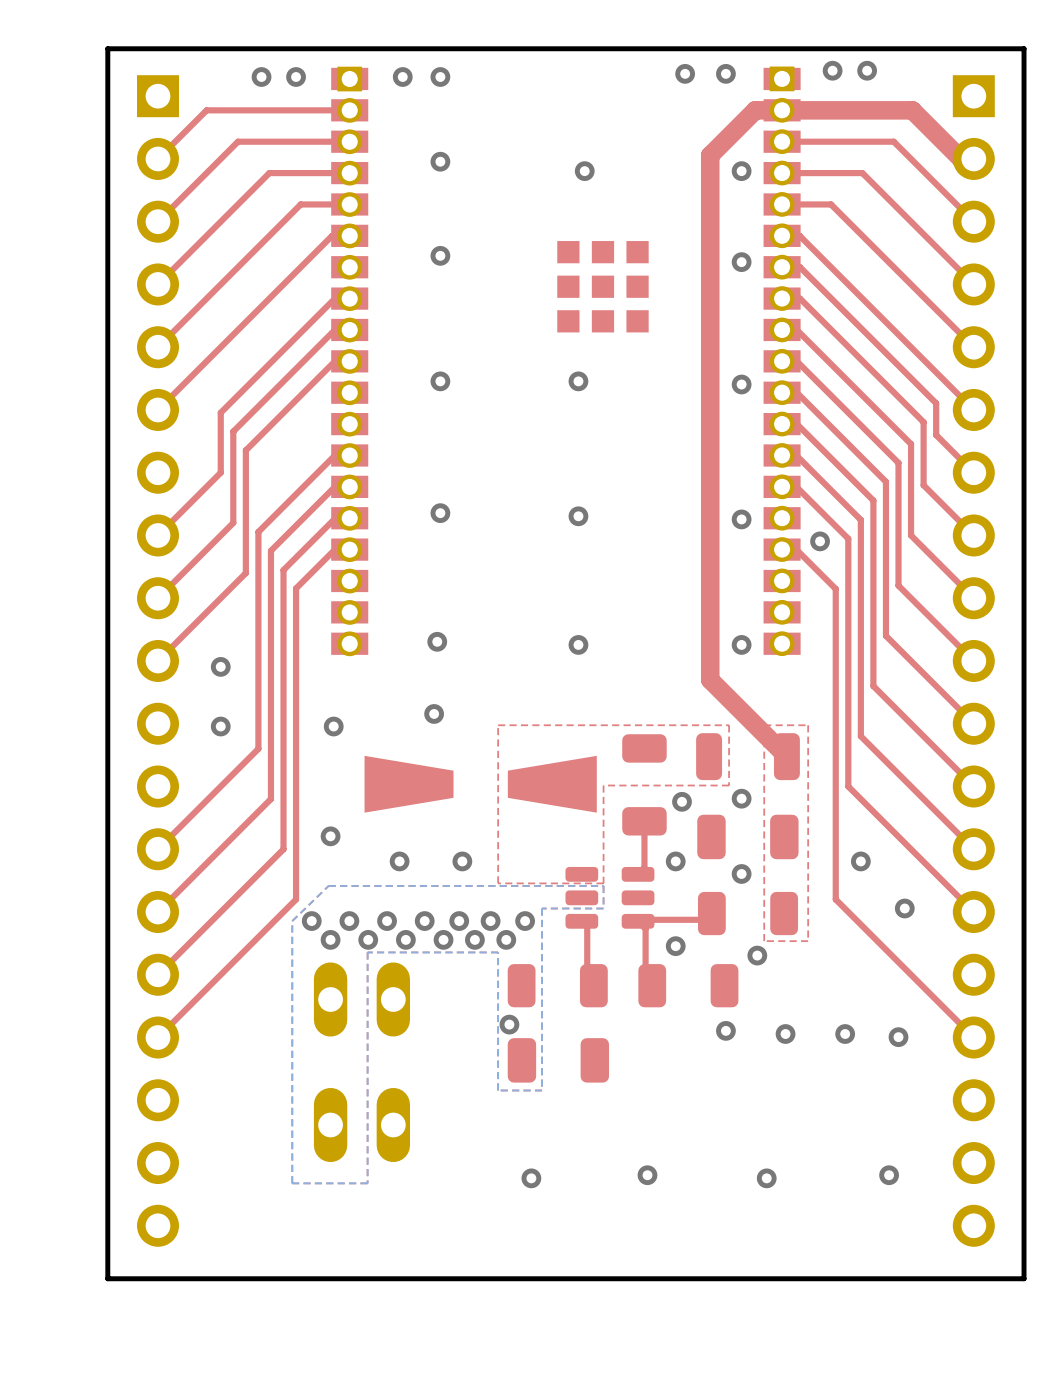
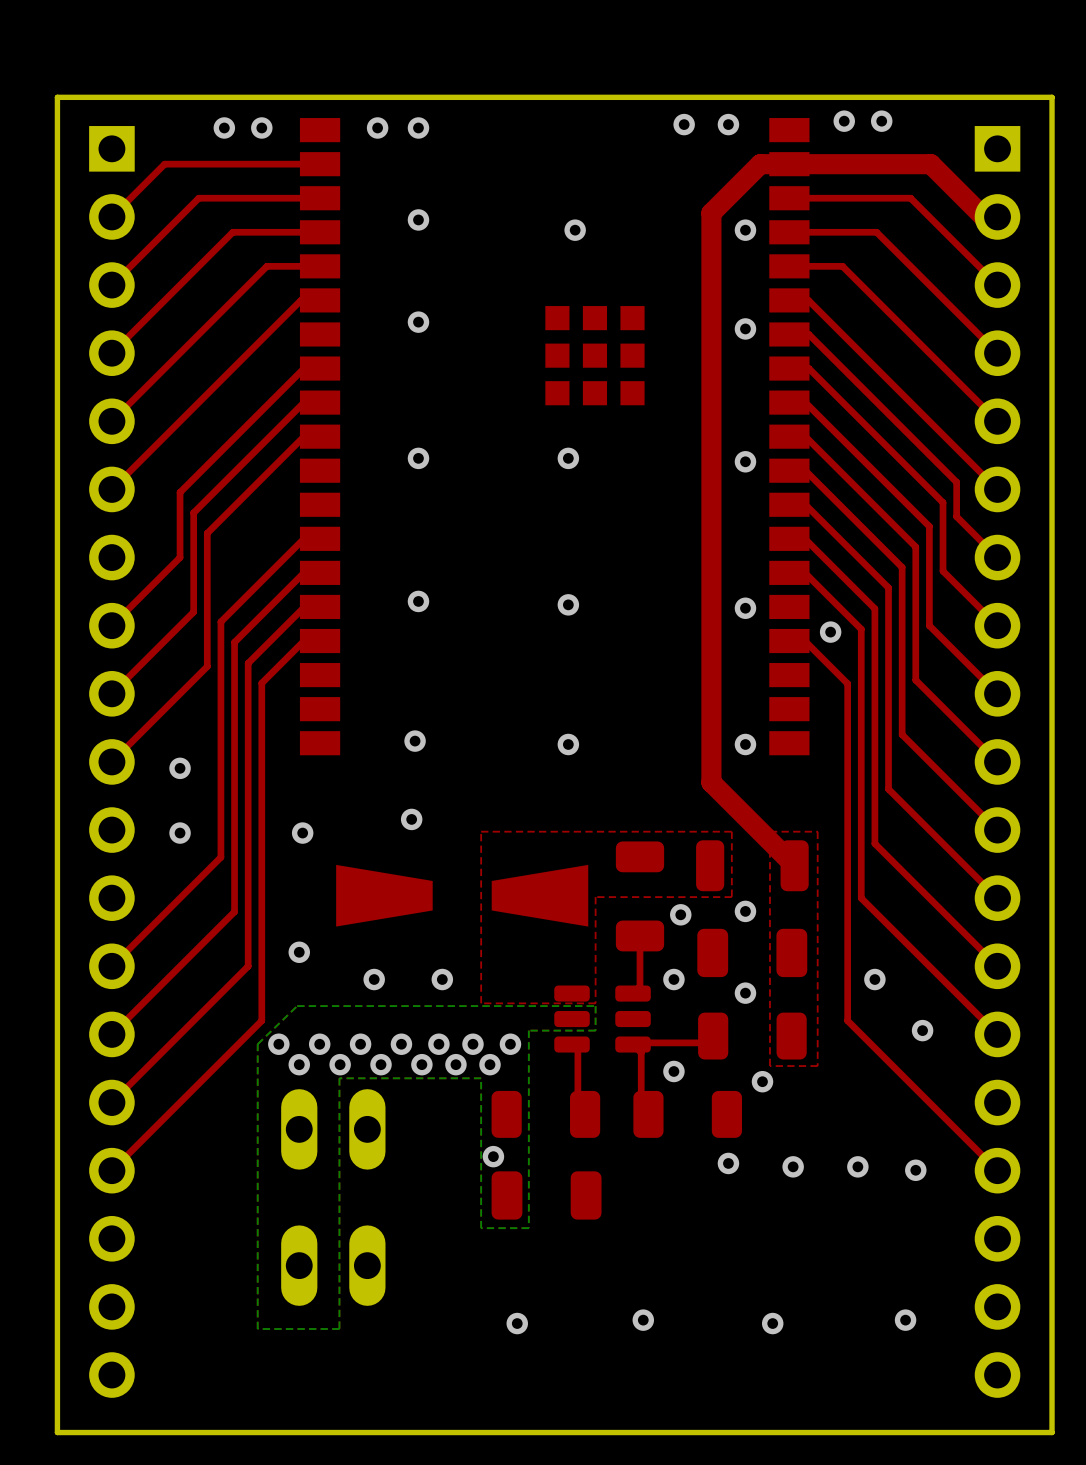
part: (349, 361) -> none
part: (782, 361) -> none

